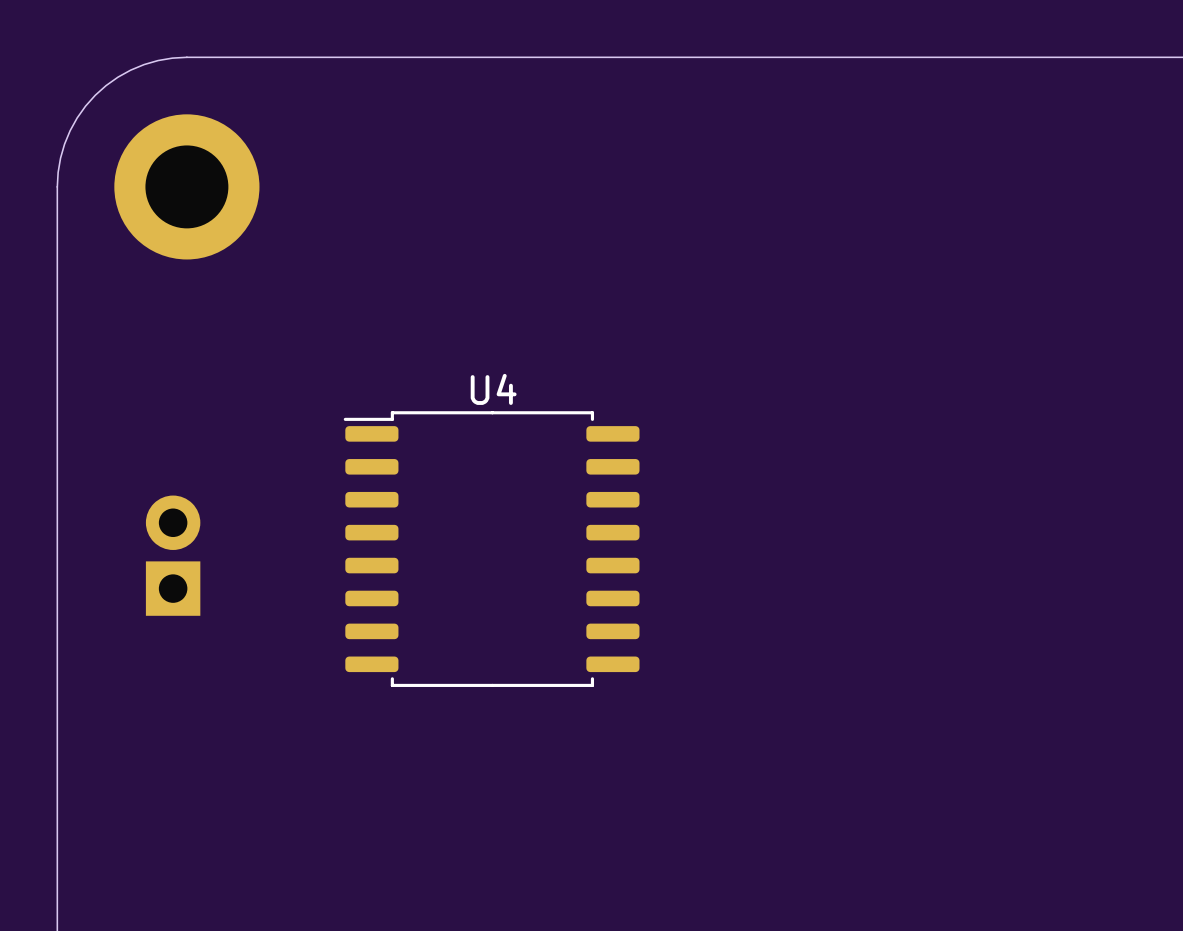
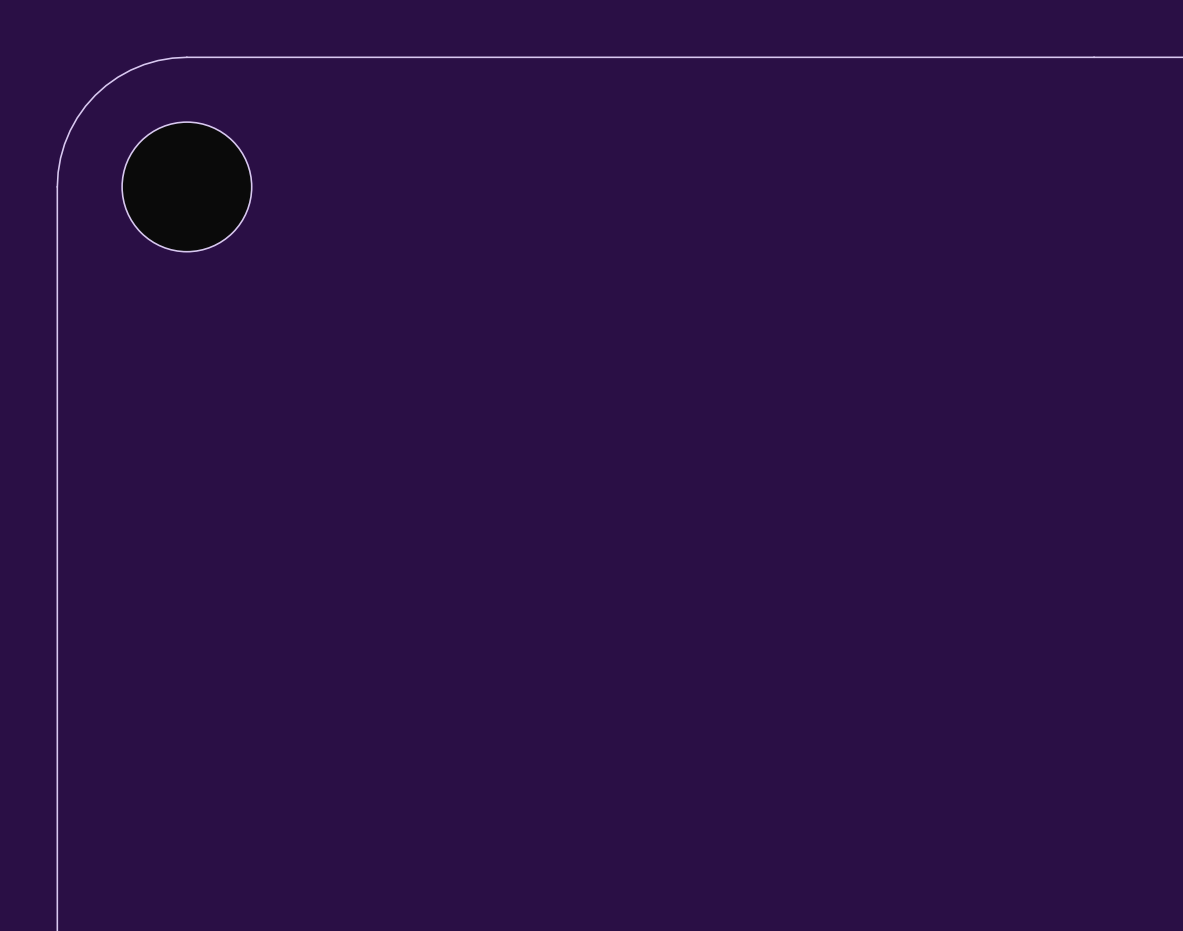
part footprint: [114, 114, 260, 260] -> [122, 122, 252, 252]
U4: (491, 549) -> none
part: (173, 555) -> none

